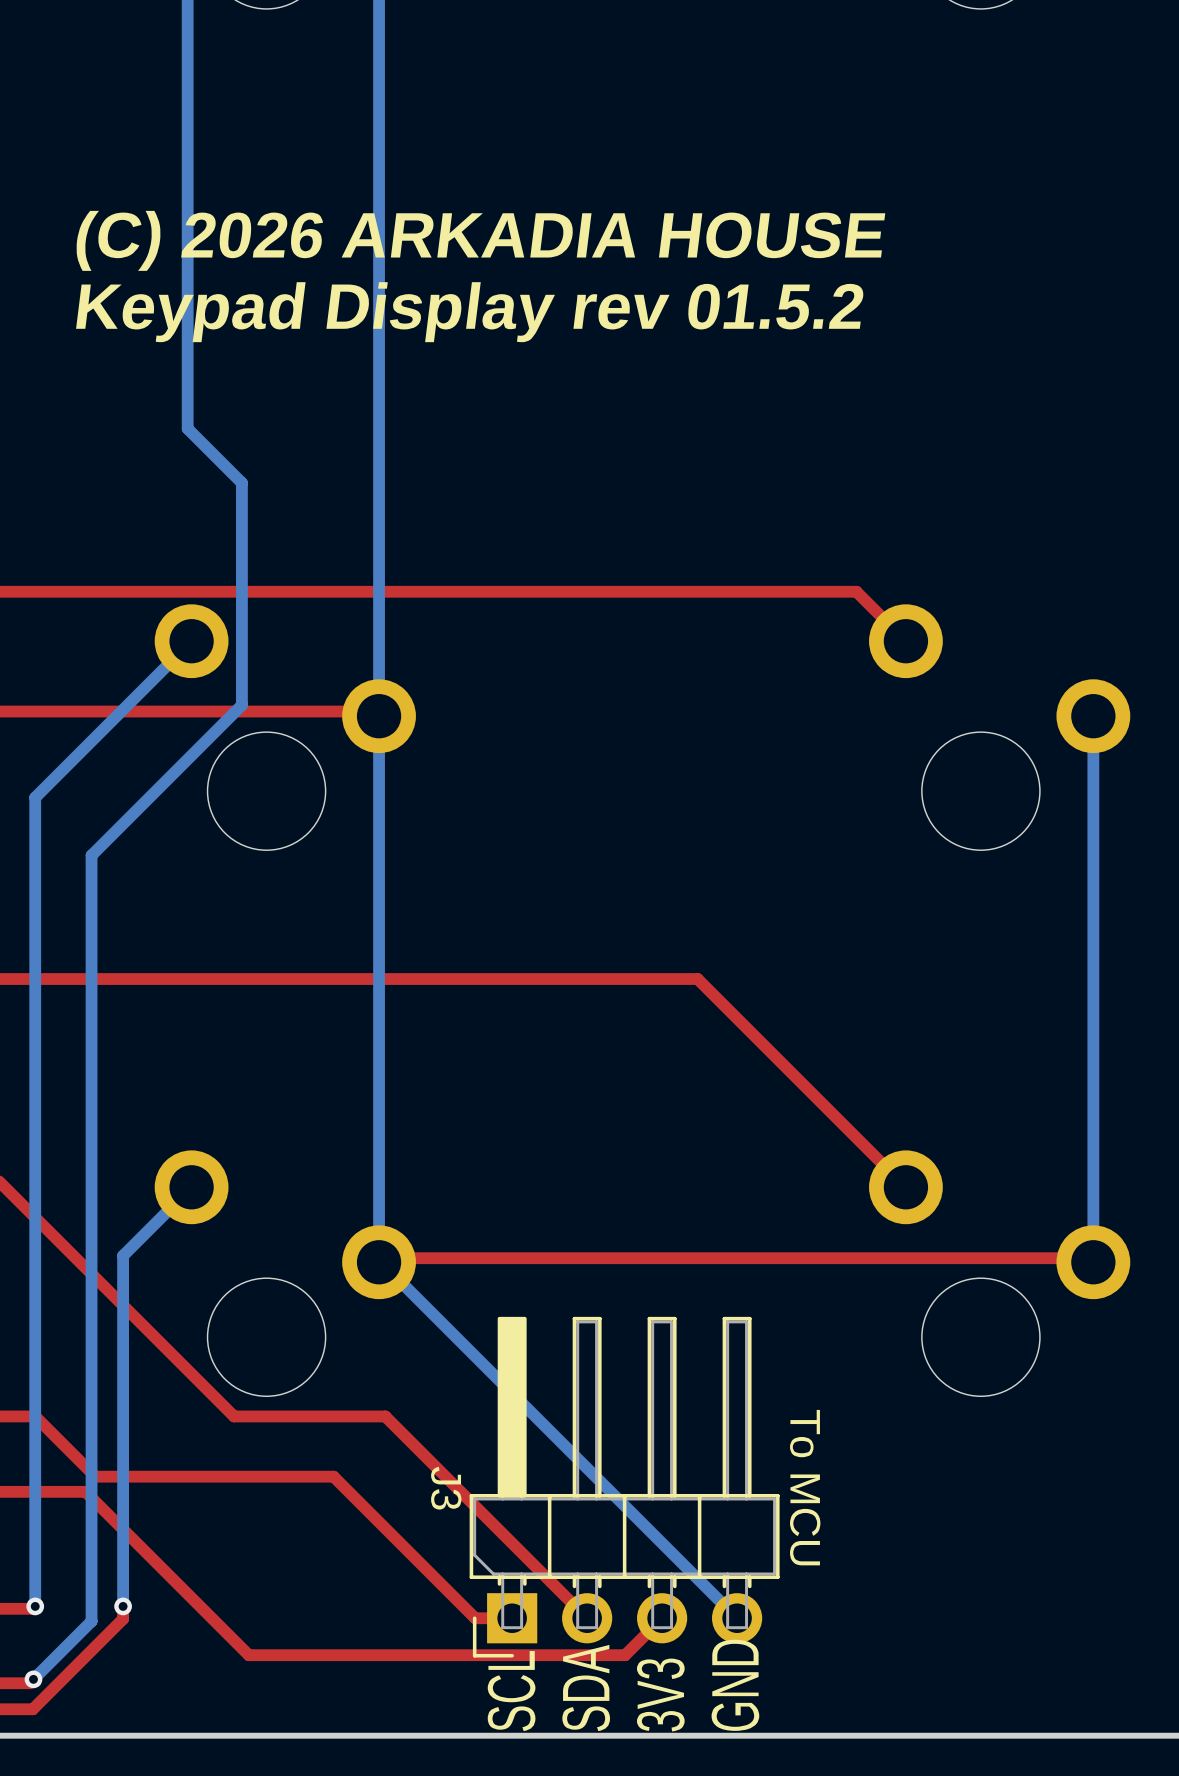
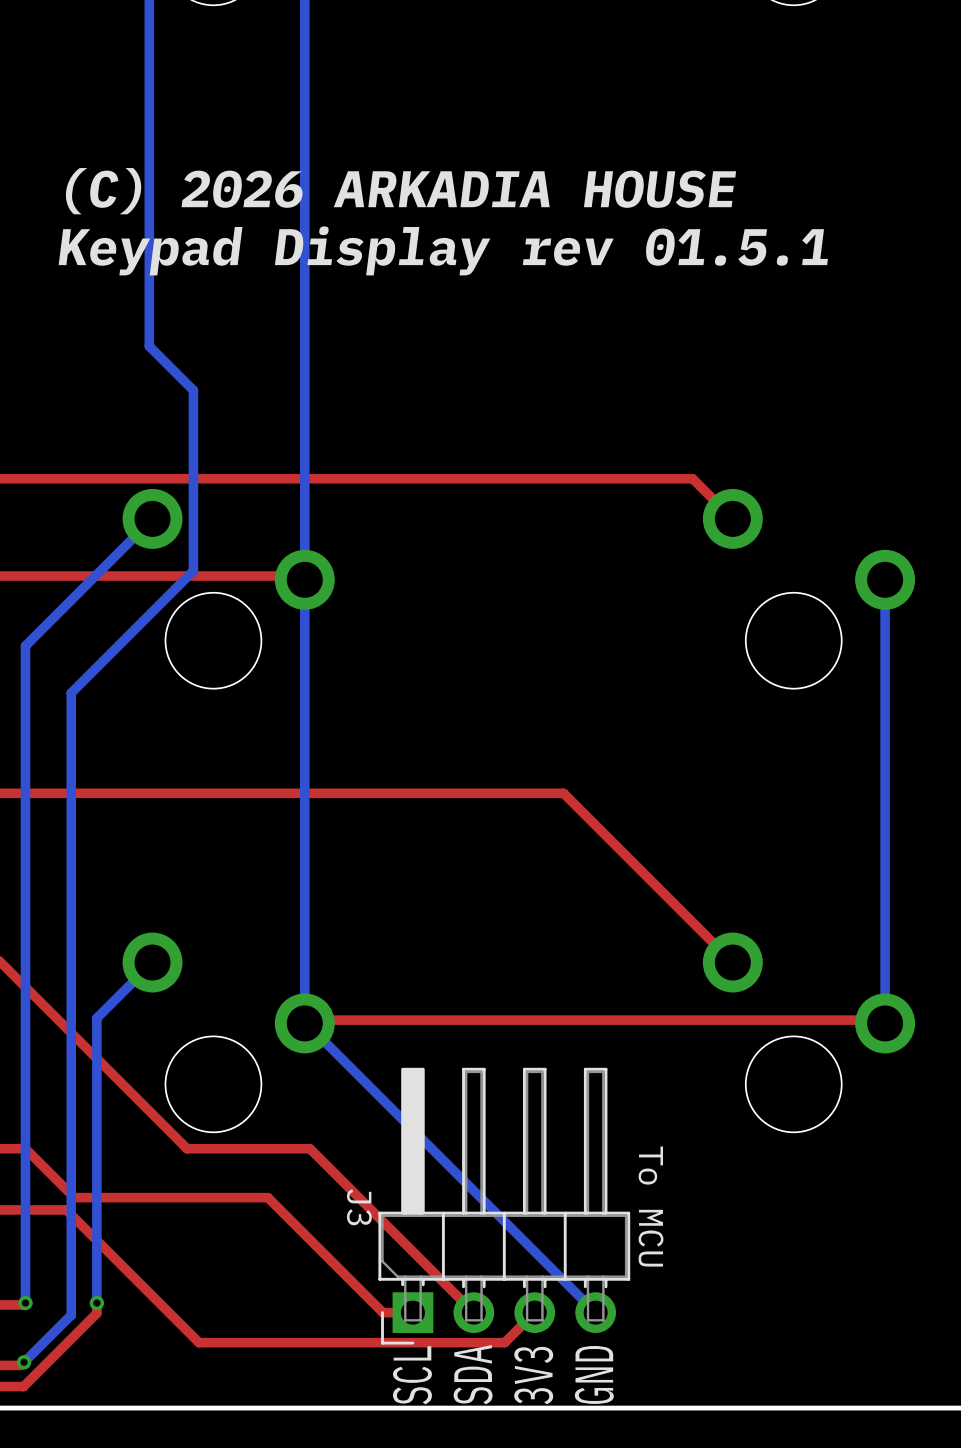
text: Keypad Display rev 01.5.2 (469, 312) -> Keypad Display rev 01.5.1 (443, 250)

